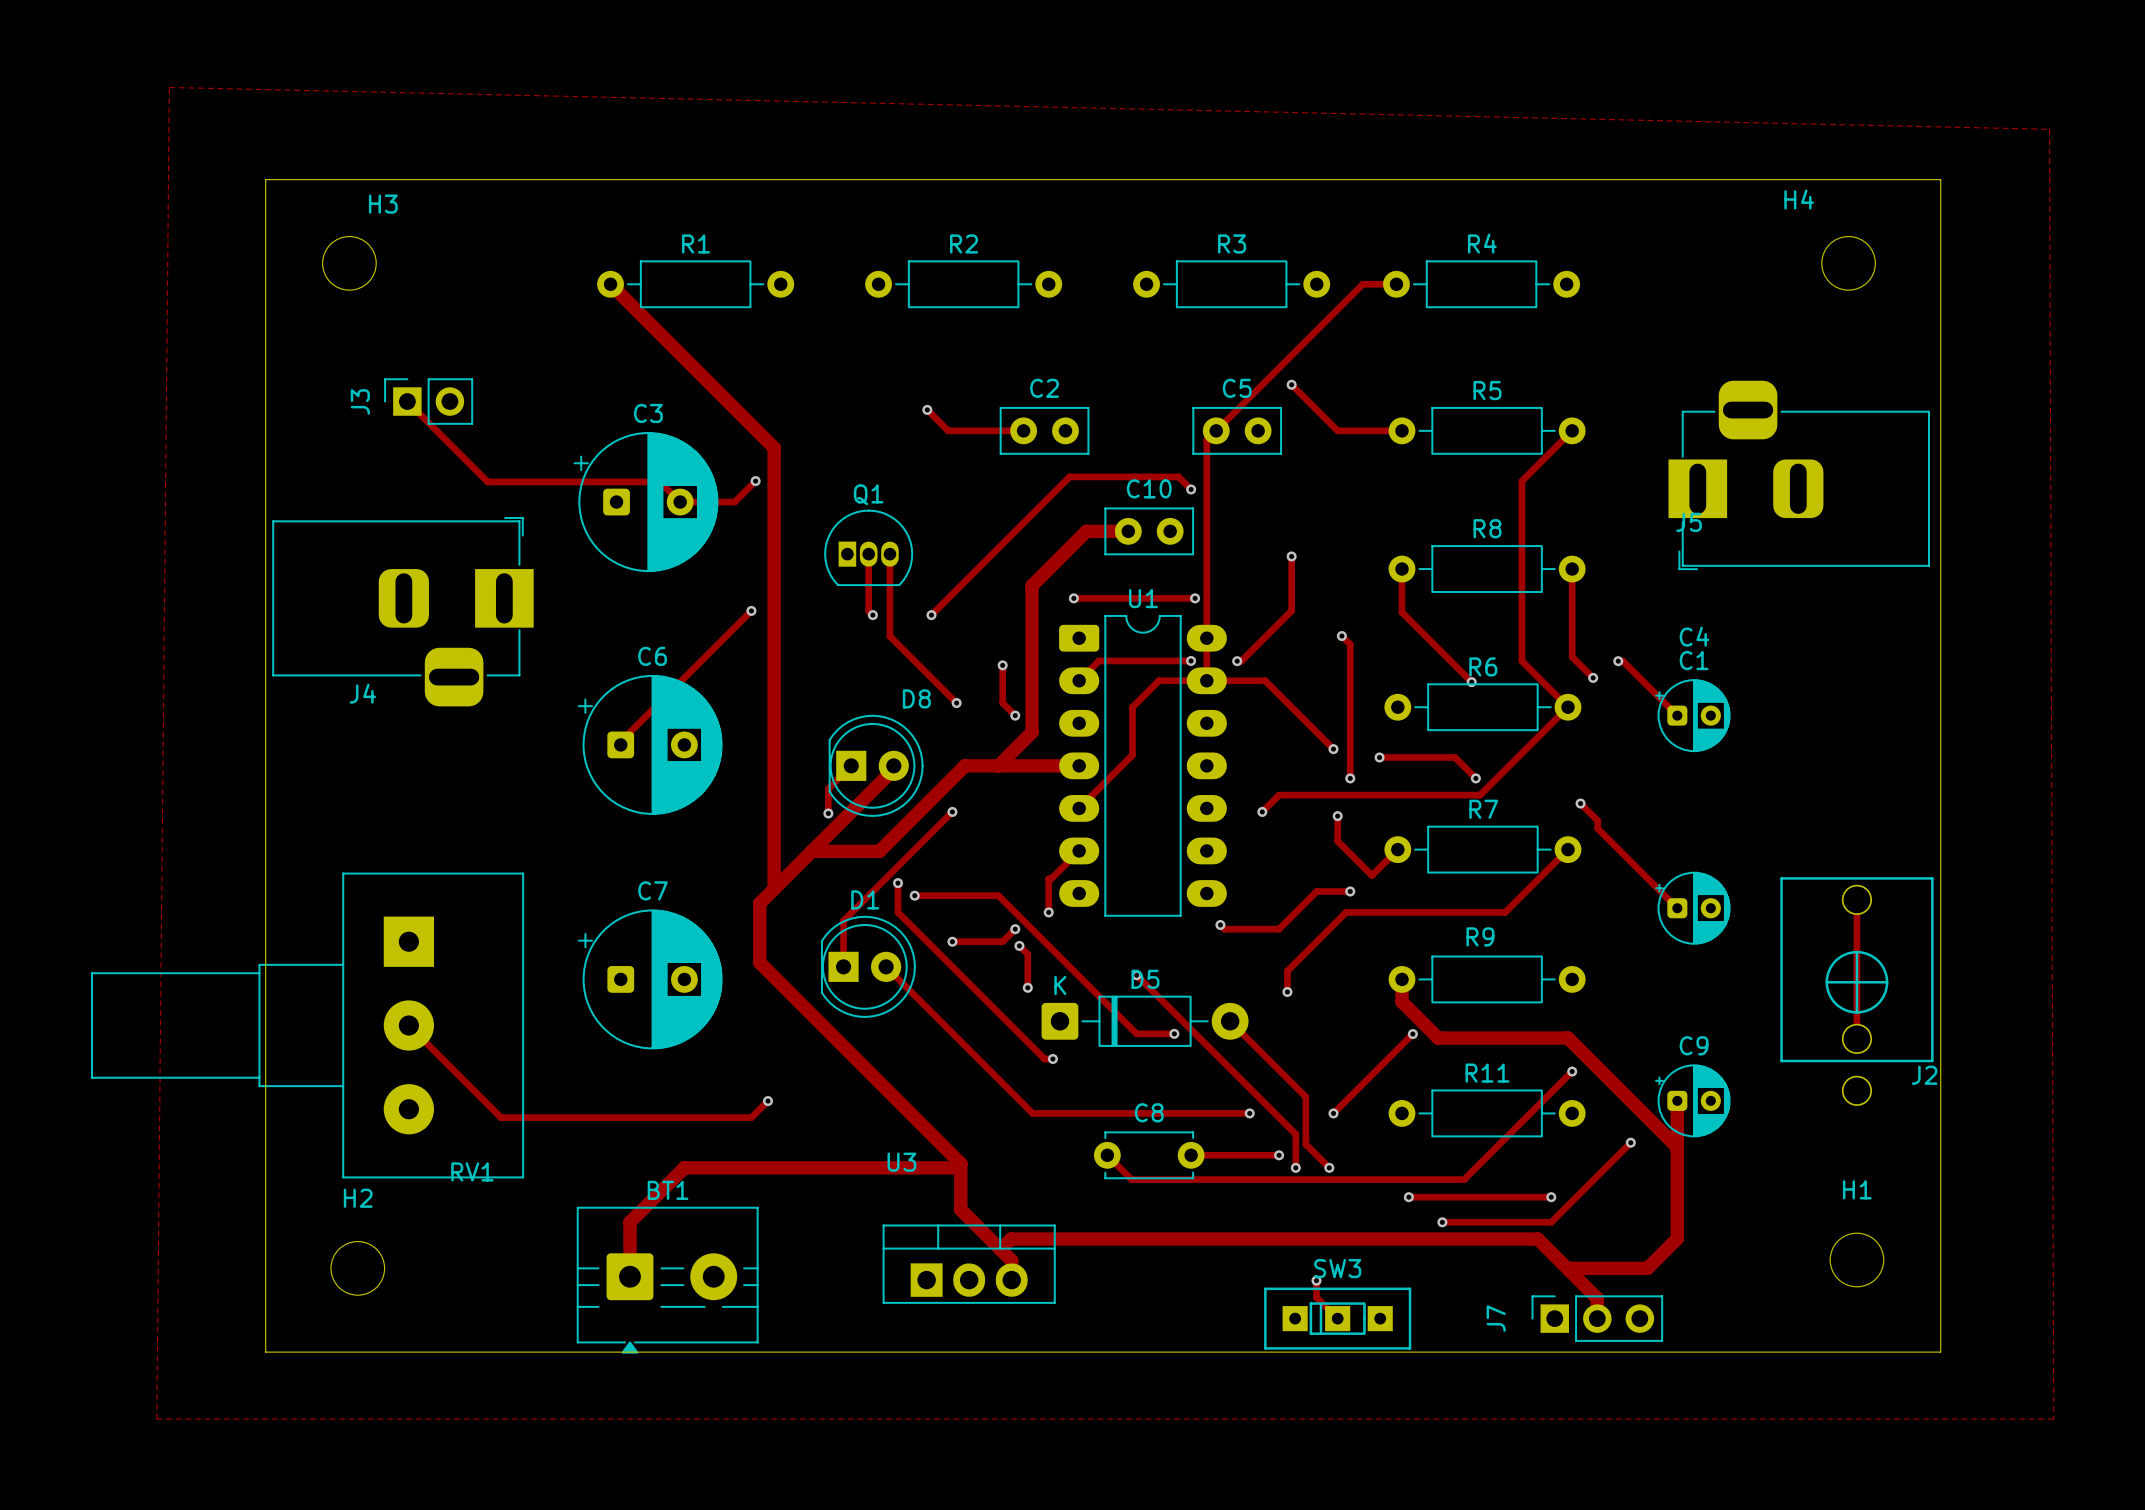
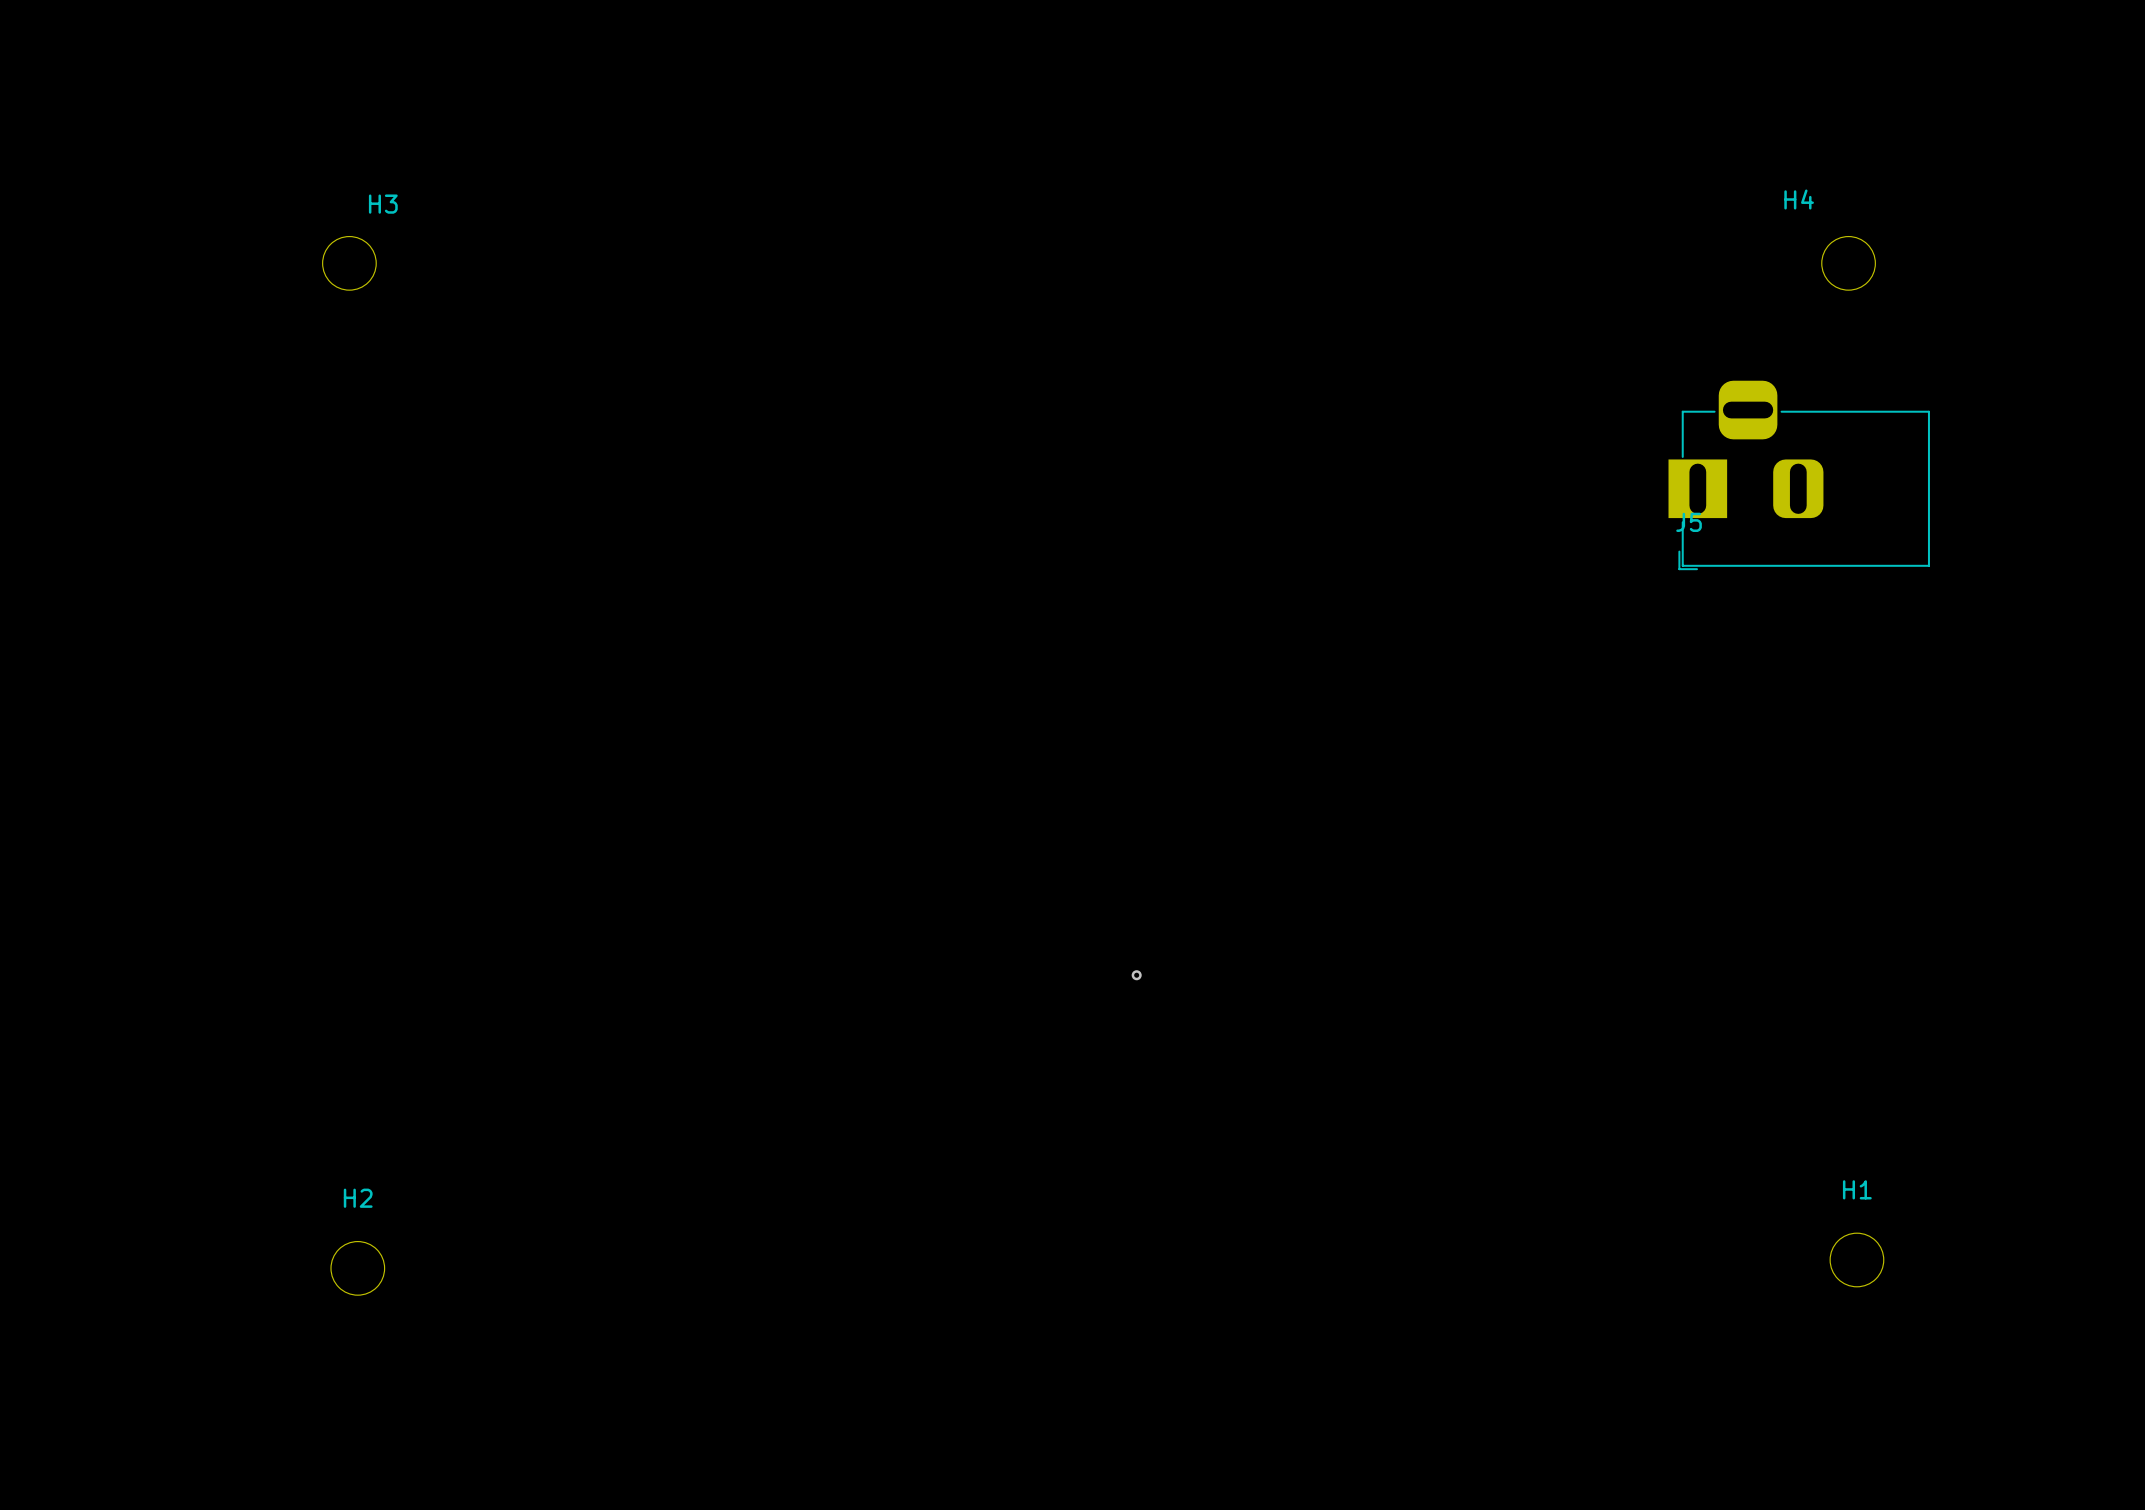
zone outline: (169, 87) (156, 1419) (2053, 1419) (2049, 129) (169, 87) -> none
board edge: (265, 179) (1940, 179) (1940, 1352) (265, 1352) (265, 179) -> none
track: (610, 284) (774, 447) (774, 889) -> none
R1: (695, 284) -> none
R2: (963, 284) -> none
R3: (1231, 284) -> none
track: (1396, 284) (1362, 284) (1206, 440) (1206, 680) -> none
R4: (1481, 284) -> none
track: (1291, 384) (1337, 430) (1402, 430) -> none
via: (1291, 384) -> none
track: (407, 401) (487, 481) (660, 481) (680, 502) (734, 502) (755, 481) -> none
J3: (428, 401) -> none
track: (927, 409) (948, 430) (1023, 430) -> none
via: (927, 409) -> none
C2: (1044, 430) -> none
C5: (1237, 430) -> none
R5: (1487, 430) -> none
track: (1572, 430) (1521, 481) (1521, 661) (1568, 707) (1480, 795) (1279, 795) (1262, 811) -> none
via: (755, 481) -> none
track: (1191, 489) (1178, 476) (1069, 476) (931, 615) -> none
via: (1191, 489) -> none
C3: (645, 502) -> none
track: (1128, 531) (1086, 531) (1031, 585) (1031, 732) (998, 765) -> none
C10: (1149, 531) -> none
Q1: (868, 547) -> none
track: (868, 554) (868, 610) (872, 615) -> none
track: (889, 554) (889, 636) (956, 703) -> none
track: (1291, 556) (1291, 610) (1241, 661) (1237, 661) -> none
via: (1291, 556) -> none
track: (1402, 569) (1402, 612) (1471, 682) -> none
R8: (1487, 569) -> none
track: (1572, 569) (1572, 656) (1593, 677) -> none
track: (1073, 598) (1195, 598) -> none
via: (1073, 598) -> none
via: (1195, 598) -> none
track: (751, 610) (620, 741) (620, 744) -> none
via: (751, 610) -> none
J4: (402, 611) -> none
via: (872, 615) -> none
via: (931, 615) -> none
track: (1341, 636) (1350, 644) (1350, 778) -> none
via: (1341, 636) -> none
track: (1191, 660) (1098, 660) (1079, 680) -> none
via: (1191, 660) -> none
via: (1237, 661) -> none
track: (1618, 661) (1622, 661) (1677, 715) -> none
via: (1618, 661) -> none
track: (1002, 665) (1002, 703) (1015, 715) -> none
via: (1002, 665) -> none
via: (1593, 677) -> none
via: (1471, 682) -> none
via: (956, 703) -> none
R6: (1482, 707) -> none
via: (1015, 715) -> none
C1: (1692, 715) -> none
C6: (650, 744) -> none
track: (1333, 749) (1265, 680) (1158, 680) (1132, 707) (1132, 755) (1079, 808) -> none
via: (1333, 749) -> none
track: (1379, 757) (1454, 757) (1475, 778) -> none
via: (1379, 757) -> none
track: (851, 765) (828, 788) (828, 813) -> none
D8: (876, 765) -> none
track: (893, 765) (893, 769) (759, 903) (759, 962) (960, 1163) -> none
track: (1079, 765) (964, 765) (879, 851) (811, 851) -> none
U1: (1143, 765) -> none
via: (1350, 778) -> none
via: (1475, 778) -> none
track: (1580, 803) (1597, 820) (1597, 828) (1677, 908) -> none
via: (1580, 803) -> none
track: (952, 811) (843, 920) (843, 966) -> none
via: (952, 811) -> none
via: (1262, 811) -> none
via: (828, 813) -> none
track: (1337, 816) (1337, 841) (1371, 875) (1397, 849) -> none
via: (1337, 816) -> none
R7: (1482, 849) -> none
track: (1568, 849) (1505, 912) (1346, 912) (1287, 971) (1287, 991) -> none
track: (1079, 850) (1051, 878) (1048, 878) (1048, 912) -> none
track: (897, 883) (897, 912) (1044, 1058) (1052, 1058) -> none
via: (897, 883) -> none
track: (1350, 891) (1316, 891) (1279, 929) (1224, 929) (1220, 924) -> none
via: (1350, 891) -> none
track: (914, 895) (998, 895) (1136, 1033) (1174, 1033) -> none
via: (914, 895) -> none
track: (1856, 899) (1856, 1038) -> none
C4: (1692, 908) -> none
via: (1048, 912) -> none
via: (1220, 924) -> none
track: (1015, 929) (1002, 941) (952, 941) -> none
via: (1015, 929) -> none
via: (952, 941) -> none
track: (1019, 945) (1027, 954) (1027, 987) -> none
via: (1019, 945) -> none
D1: (868, 966) -> none
track: (886, 966) (1032, 1113) (1249, 1113) -> none
track: (1136, 975) (1295, 1134) (1295, 1167) -> none
C7: (650, 979) -> none
track: (1402, 979) (1402, 1001) (1438, 1038) (1568, 1038) (1677, 1147) -> none
R9: (1487, 979) -> none
via: (1027, 987) -> none
via: (1287, 991) -> none
J2: (1856, 991) -> none
D5: (1145, 1021) -> none
track: (1230, 1021) (1305, 1097) (1305, 1144) (1329, 1167) -> none
RV1: (307, 1025) -> none
track: (408, 1025) (501, 1117) (751, 1117) (767, 1101) -> none
via: (1174, 1033) -> none
track: (1412, 1034) (1333, 1113) -> none
via: (1412, 1034) -> none
via: (1052, 1058) -> none
track: (1572, 1071) (1464, 1179) (1131, 1179) (1107, 1155) -> none
via: (1572, 1071) -> none
track: (1677, 1100) (1677, 1238) (1647, 1268) (1572, 1268) (1569, 1270) -> none
C9: (1692, 1100) -> none
via: (767, 1101) -> none
via: (1249, 1113) -> none
via: (1333, 1113) -> none
R11: (1487, 1113) -> none
track: (1630, 1142) (1551, 1222) (1442, 1222) -> none
via: (1630, 1142) -> none
C8: (1149, 1155) -> none
track: (1191, 1155) (1279, 1155) -> none
via: (1279, 1155) -> none
track: (960, 1163) (956, 1167) (684, 1167) (629, 1222) (629, 1276) -> none
track: (960, 1163) (960, 1209) (1011, 1260) (1011, 1280) -> none
via: (1295, 1167) -> none
via: (1329, 1167) -> none
track: (1408, 1197) (1551, 1197) -> none
via: (1408, 1197) -> none
via: (1551, 1197) -> none
via: (1442, 1222) -> none
track: (1000, 1249) (1011, 1239) (1537, 1239) (1597, 1298) (1597, 1318) -> none
U3: (969, 1264) -> none
BT1: (667, 1280) -> none
track: (1316, 1280) (1316, 1297) (1337, 1318) -> none
via: (1316, 1280) -> none
SW3: (1337, 1318) -> none
J7: (1597, 1318) -> none

